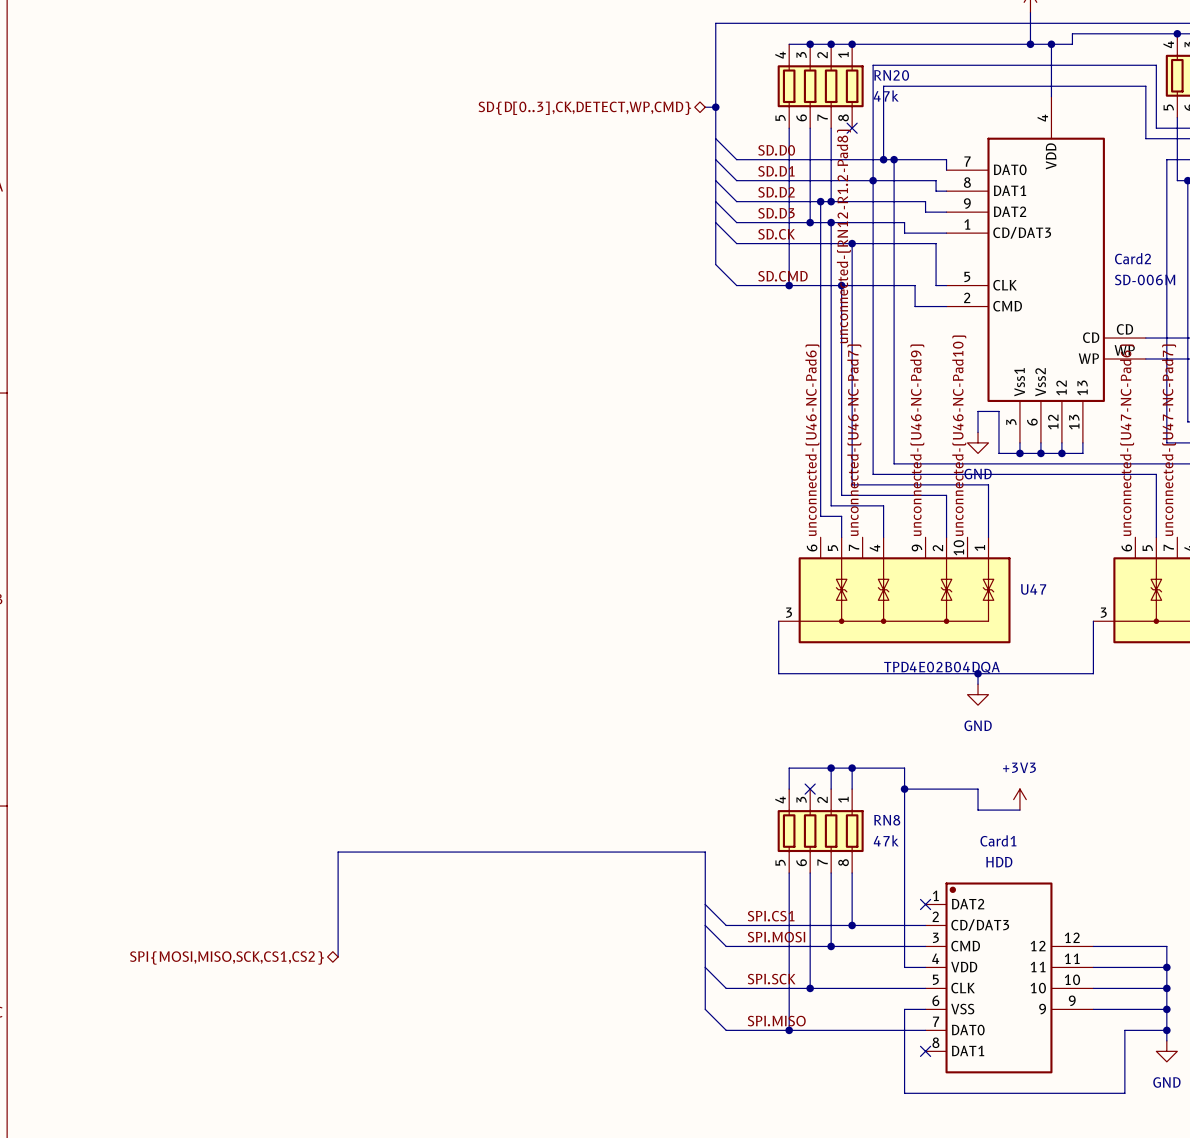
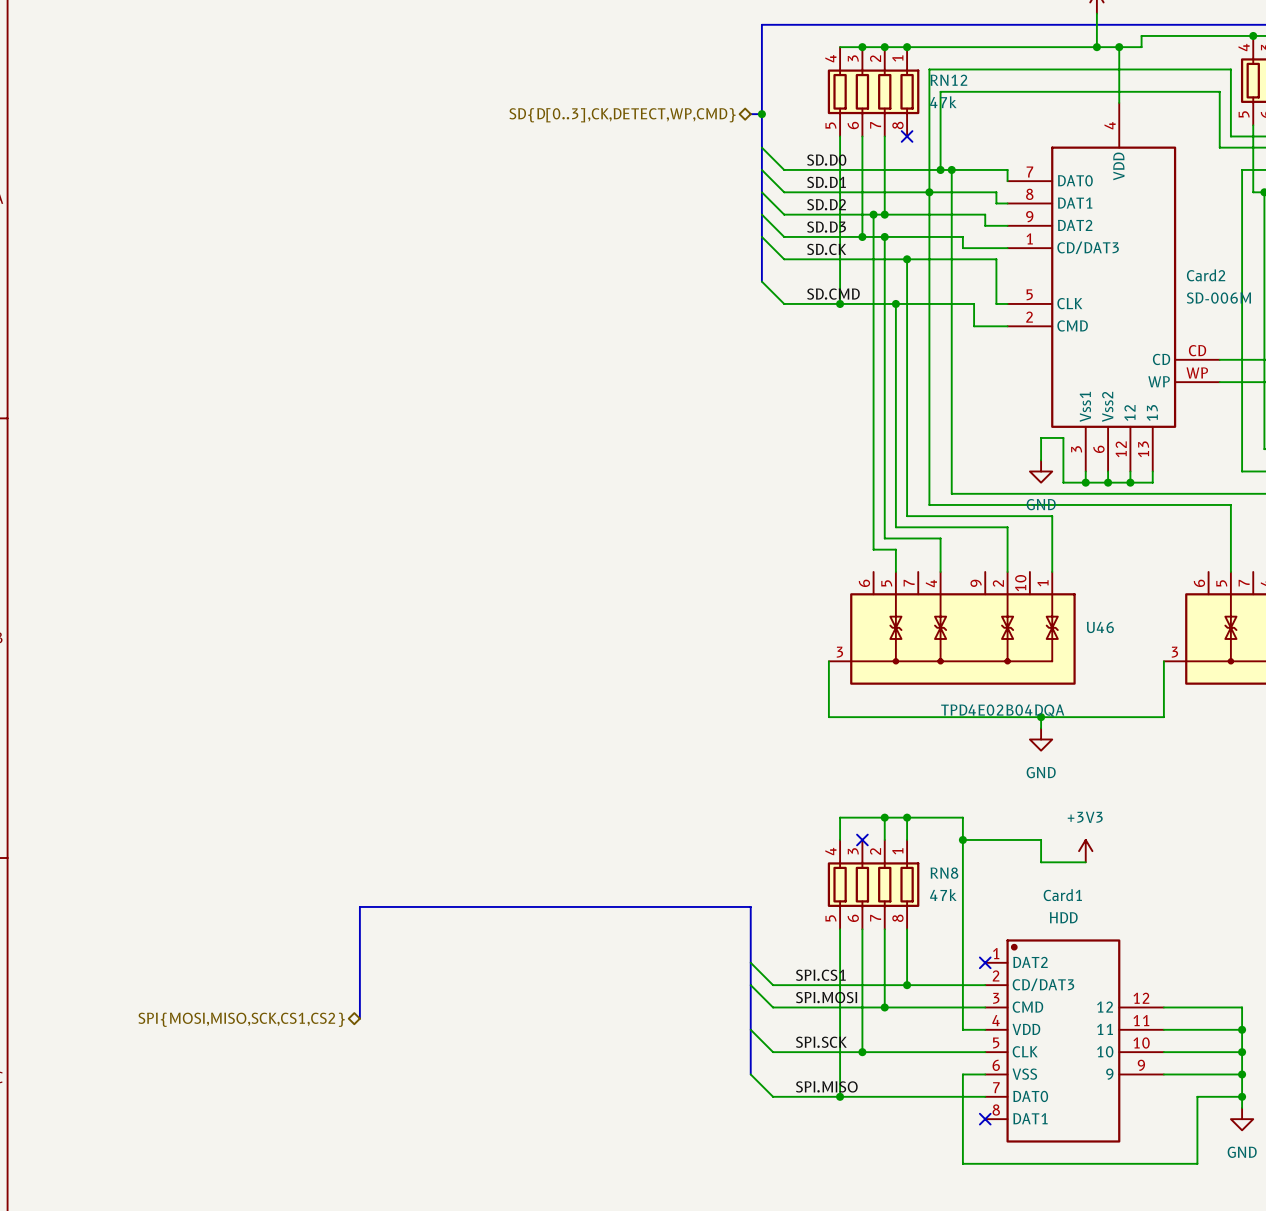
RN20 name: RN20 (891, 75) -> RN12 (948, 80)
label: unconnected-(RN12-R1.2-Pad8) (843, 236) -> none
label: unconnected-(U46-NC-Pad10) (959, 435) -> none
label: unconnected-(U46-NC-Pad6) (812, 440) -> none
label: unconnected-(U46-NC-Pad7) (854, 440) -> none
label: unconnected-(U46-NC-Pad9) (917, 440) -> none
label: unconnected-(U47-NC-Pad6) (1127, 440) -> none
label: unconnected-(U47-NC-Pad7) (1169, 440) -> none
U47 name: U47 (1033, 589) -> U46 (1100, 627)

